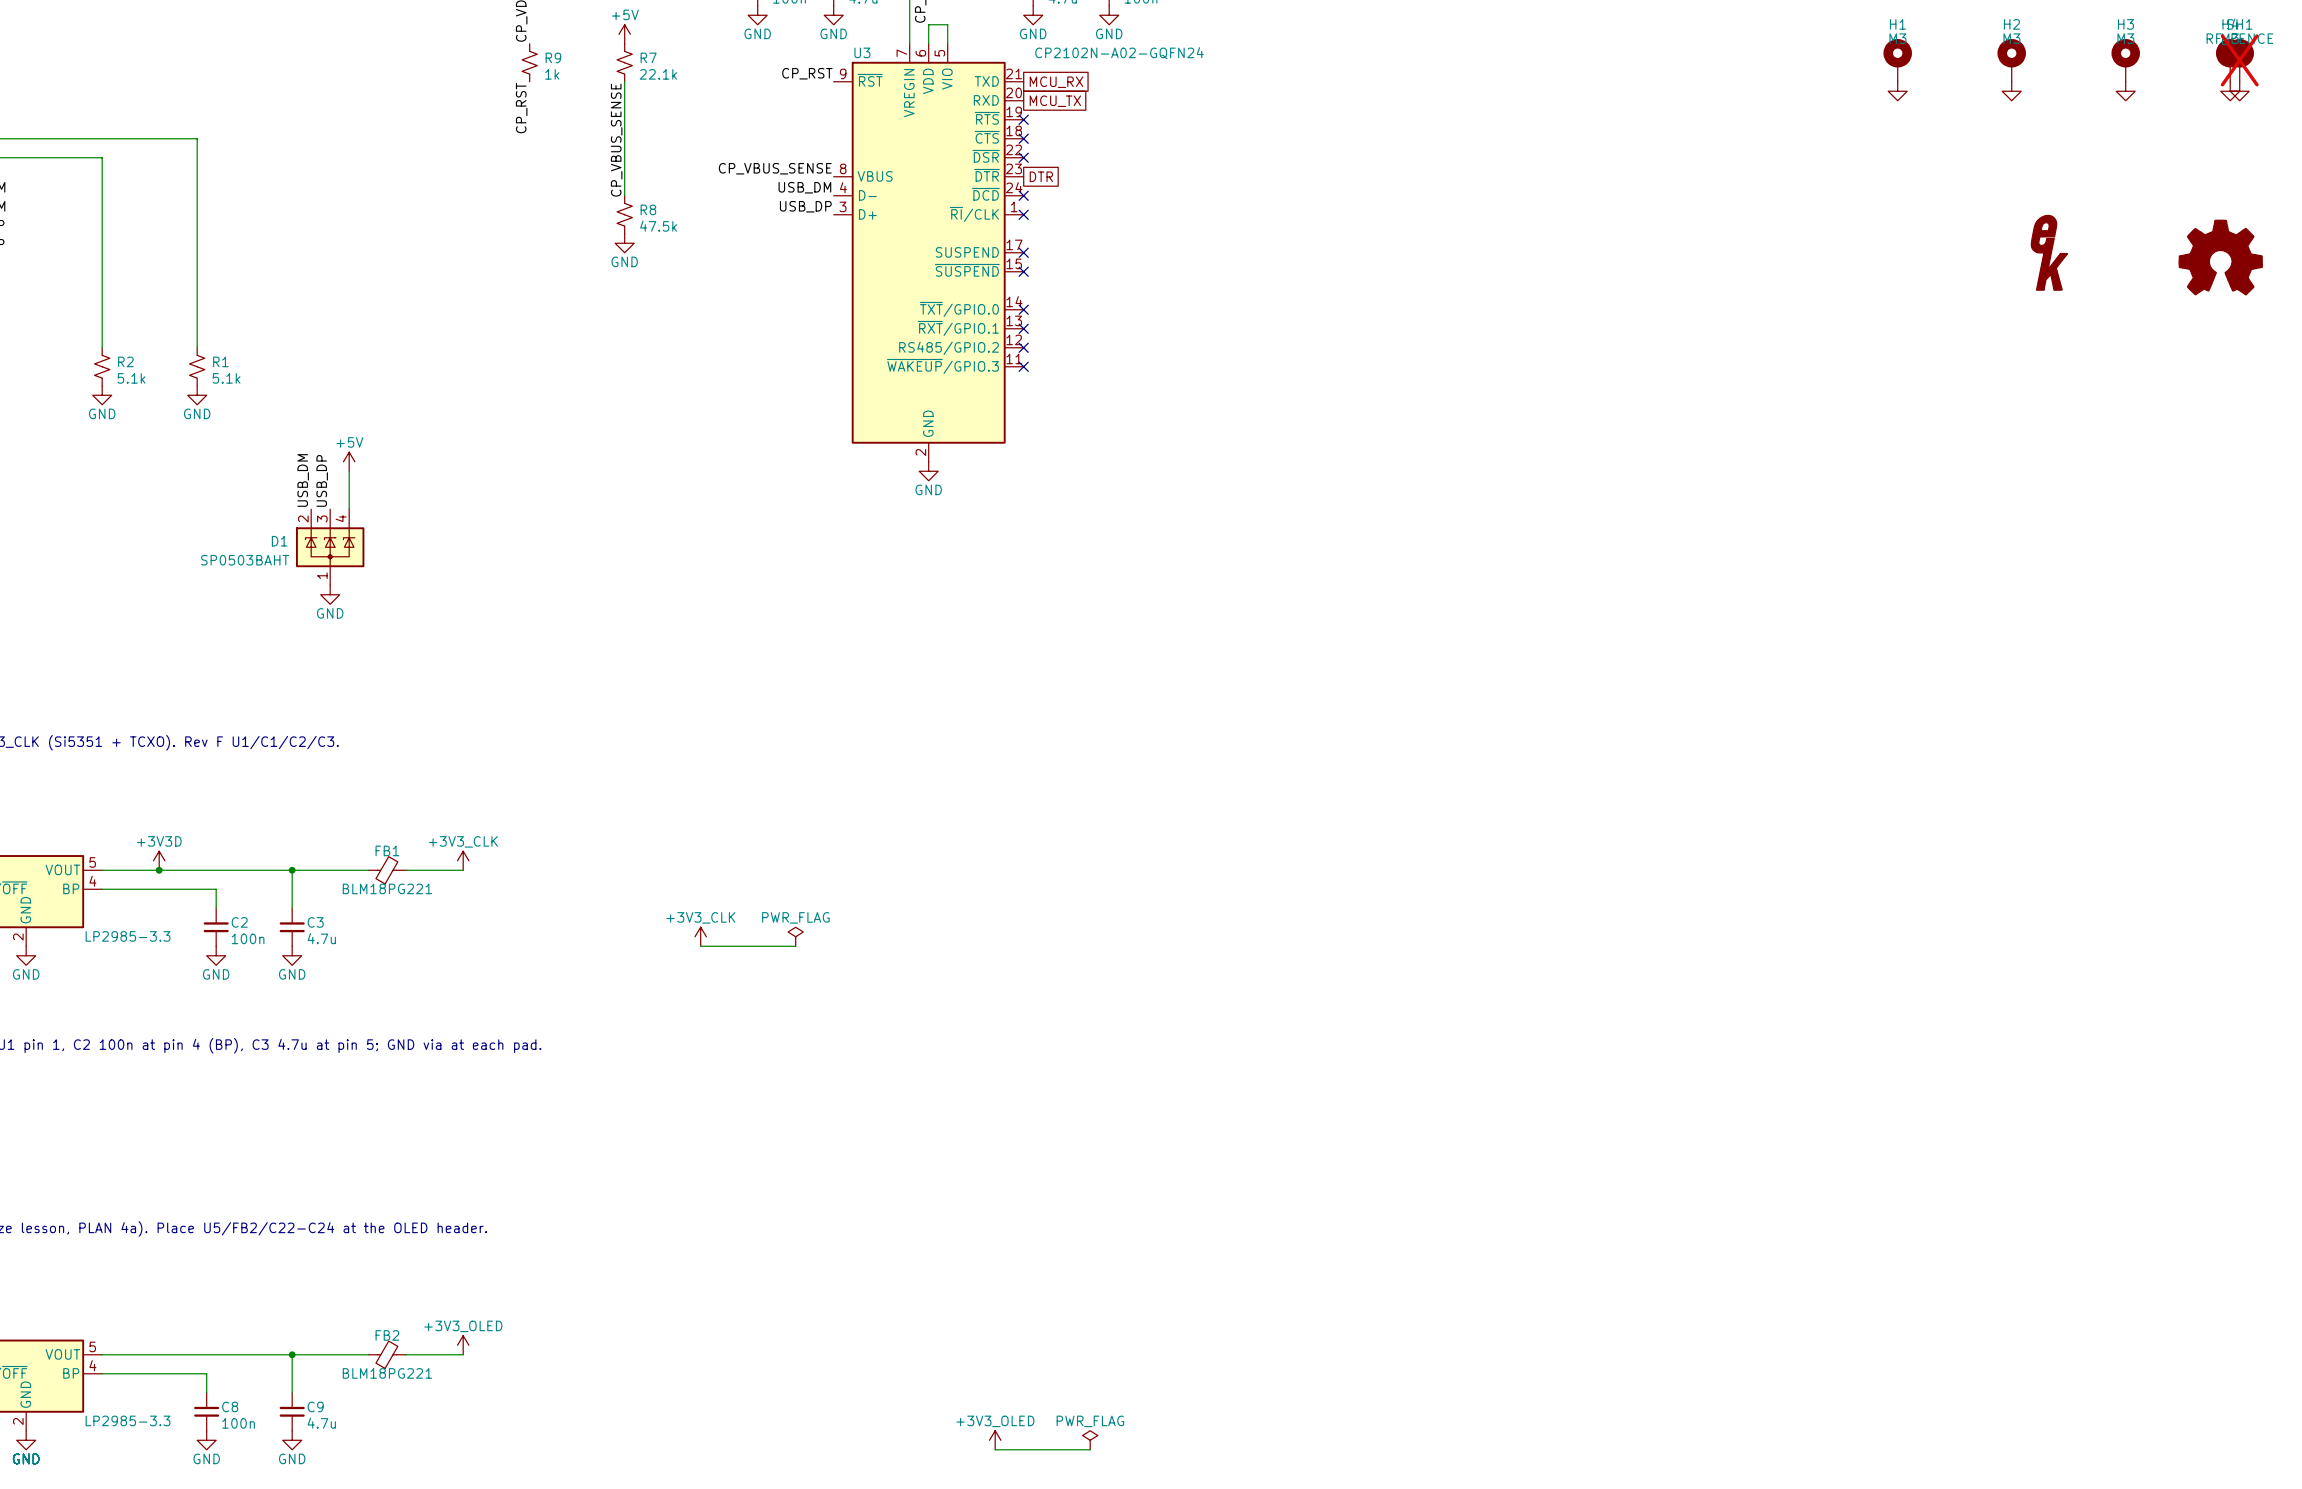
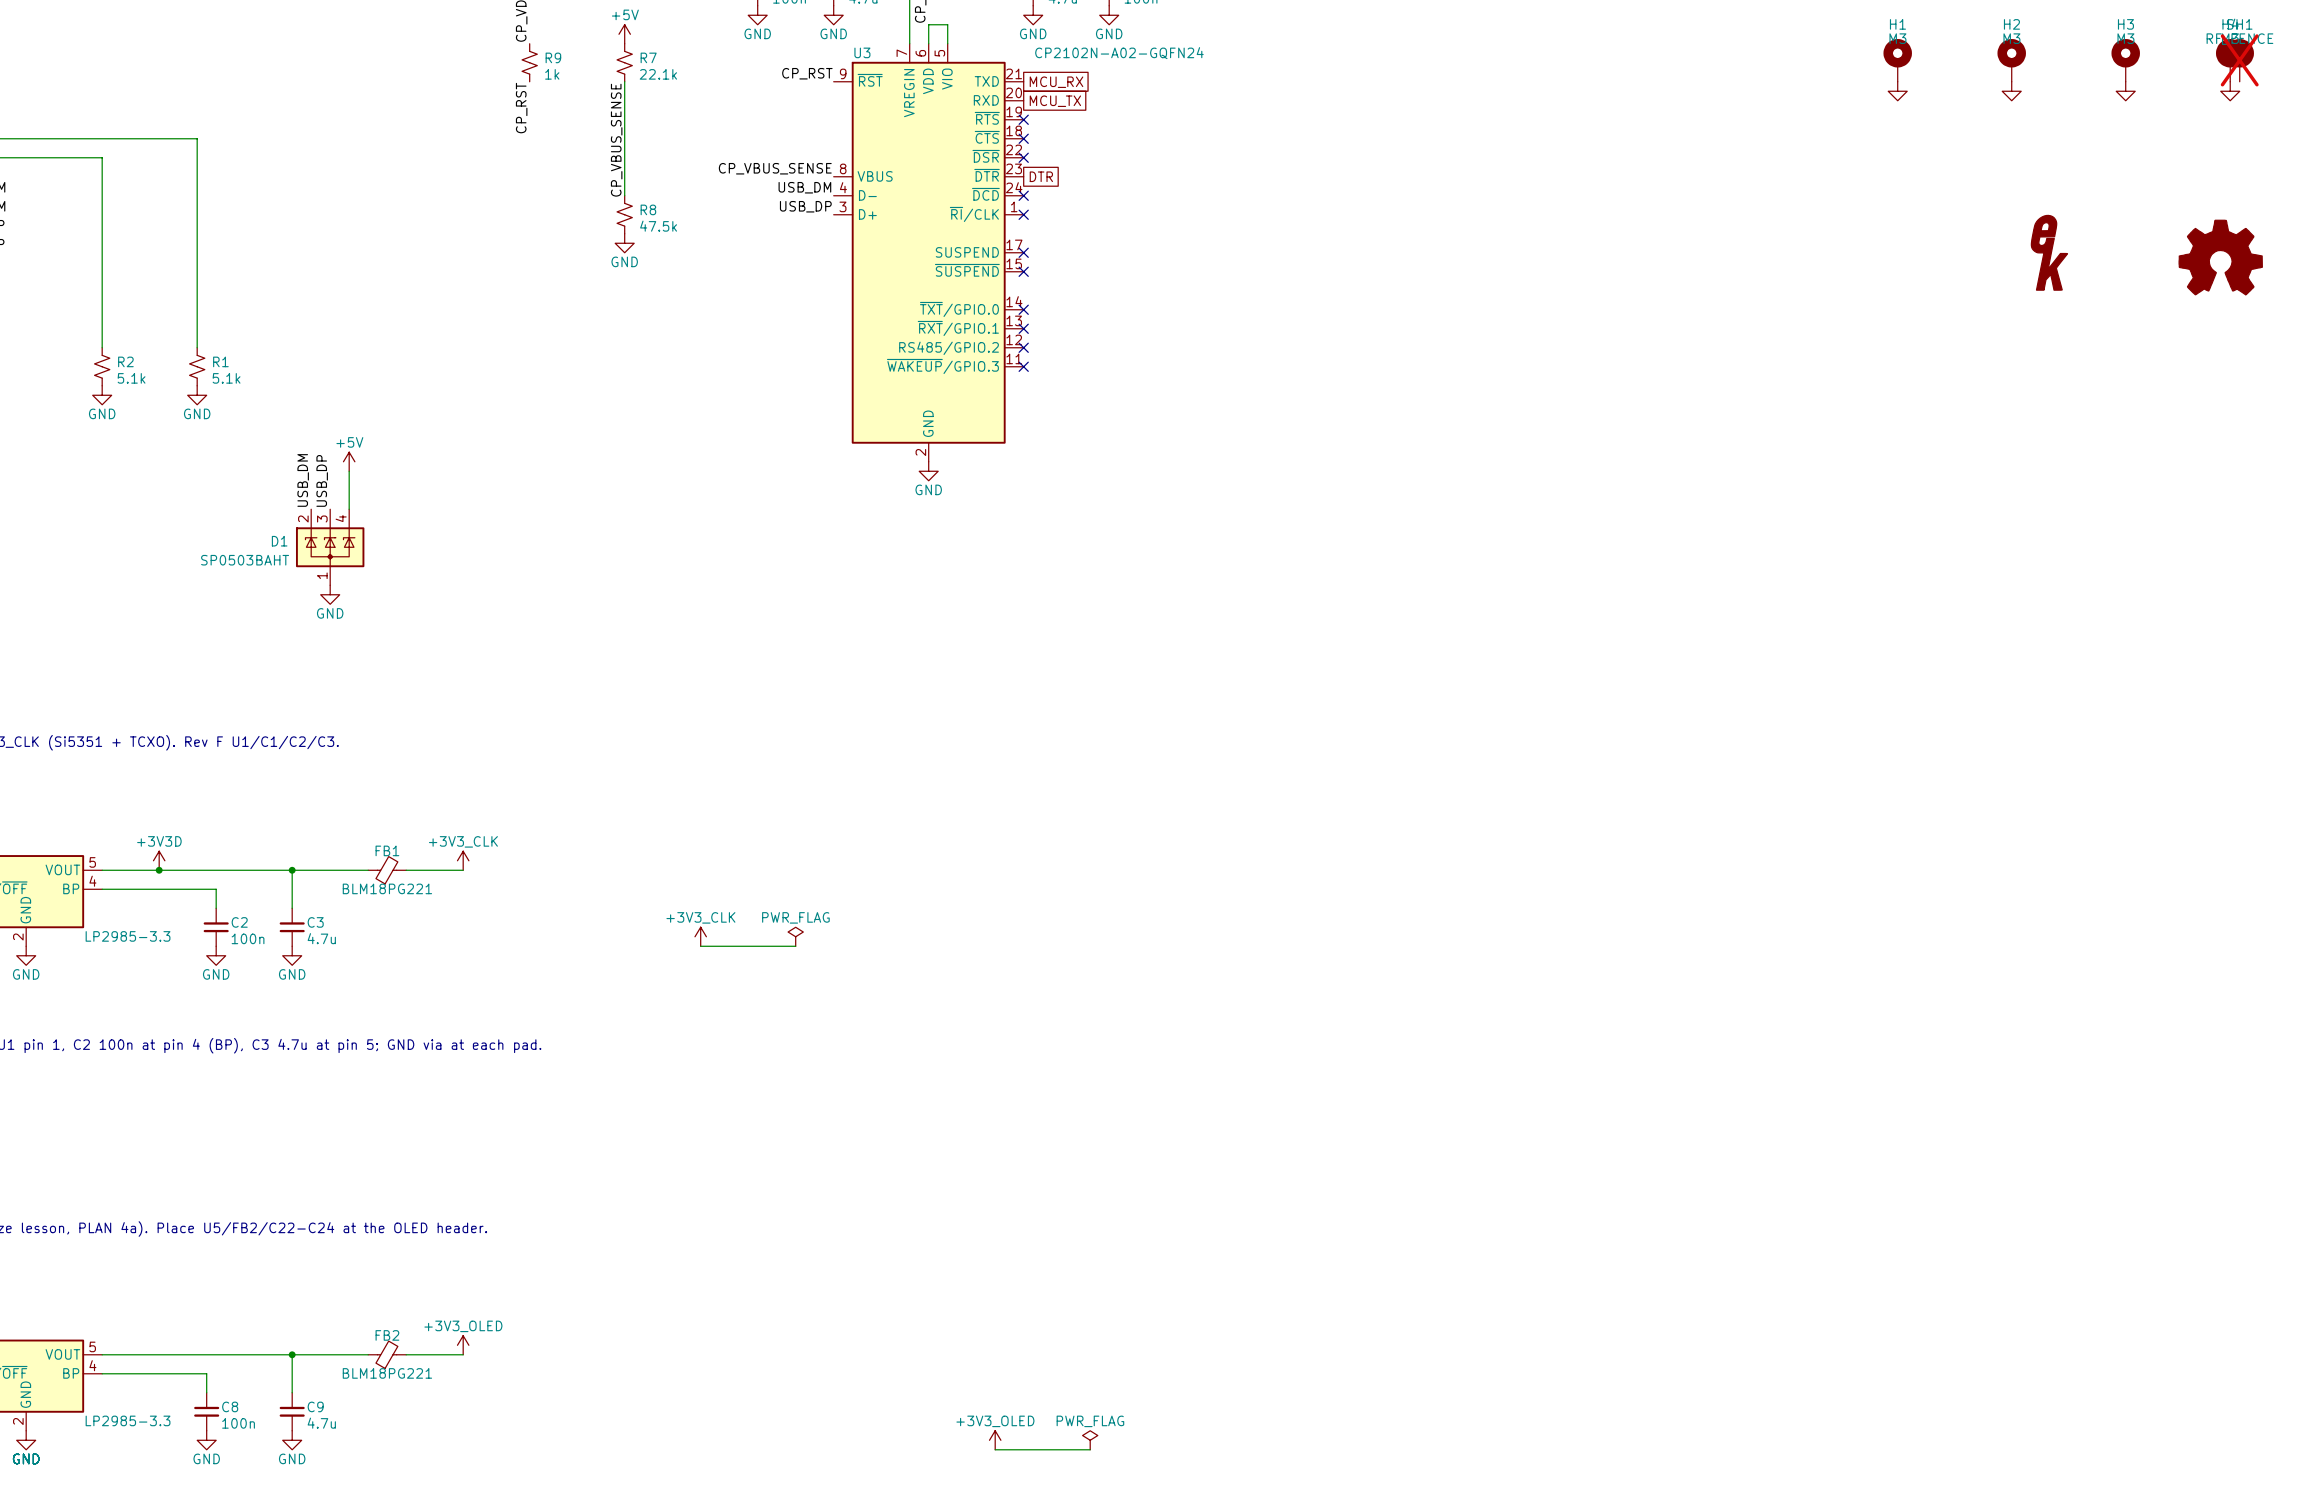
power symbol: GND (2239, 91) -> none

